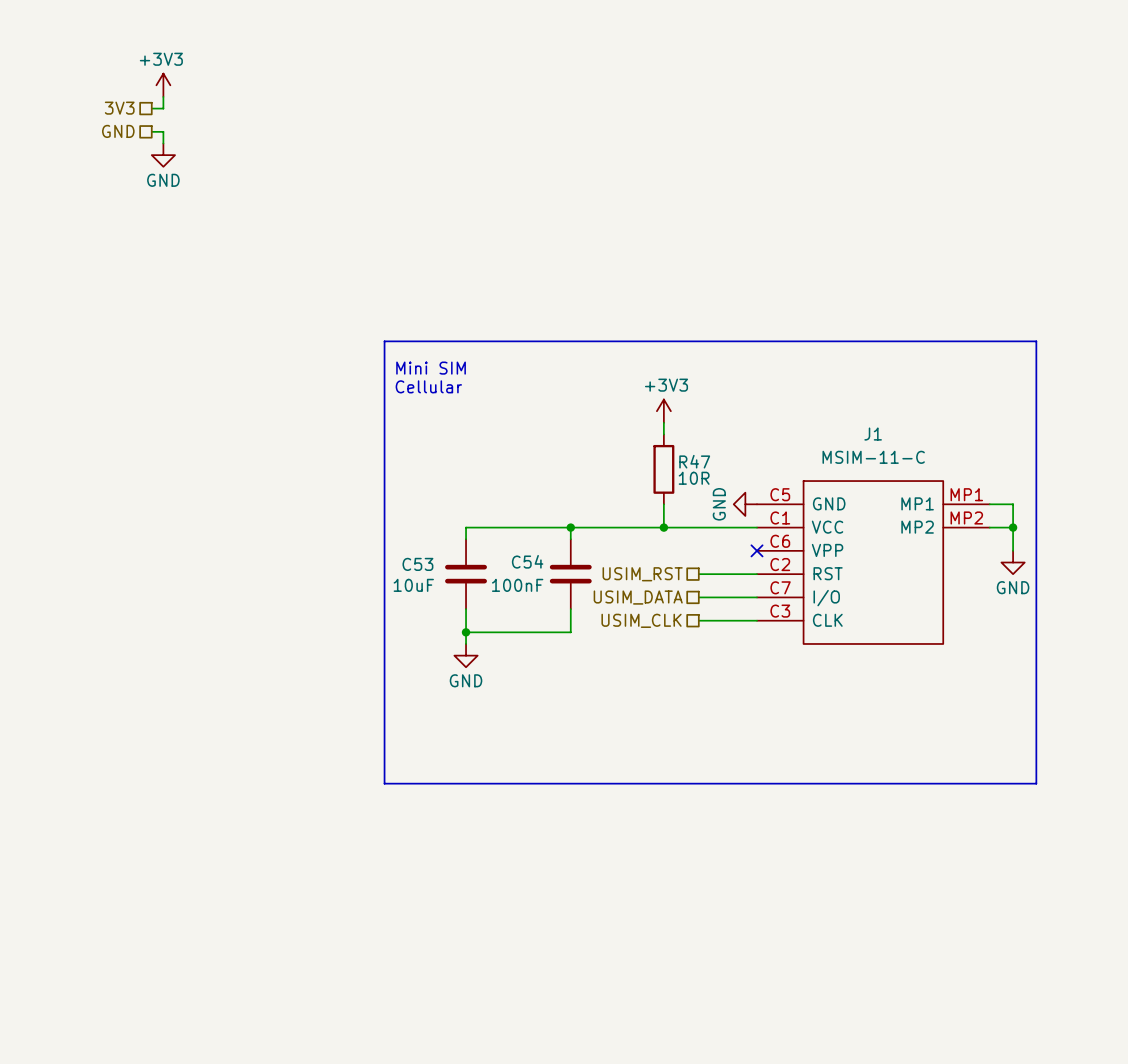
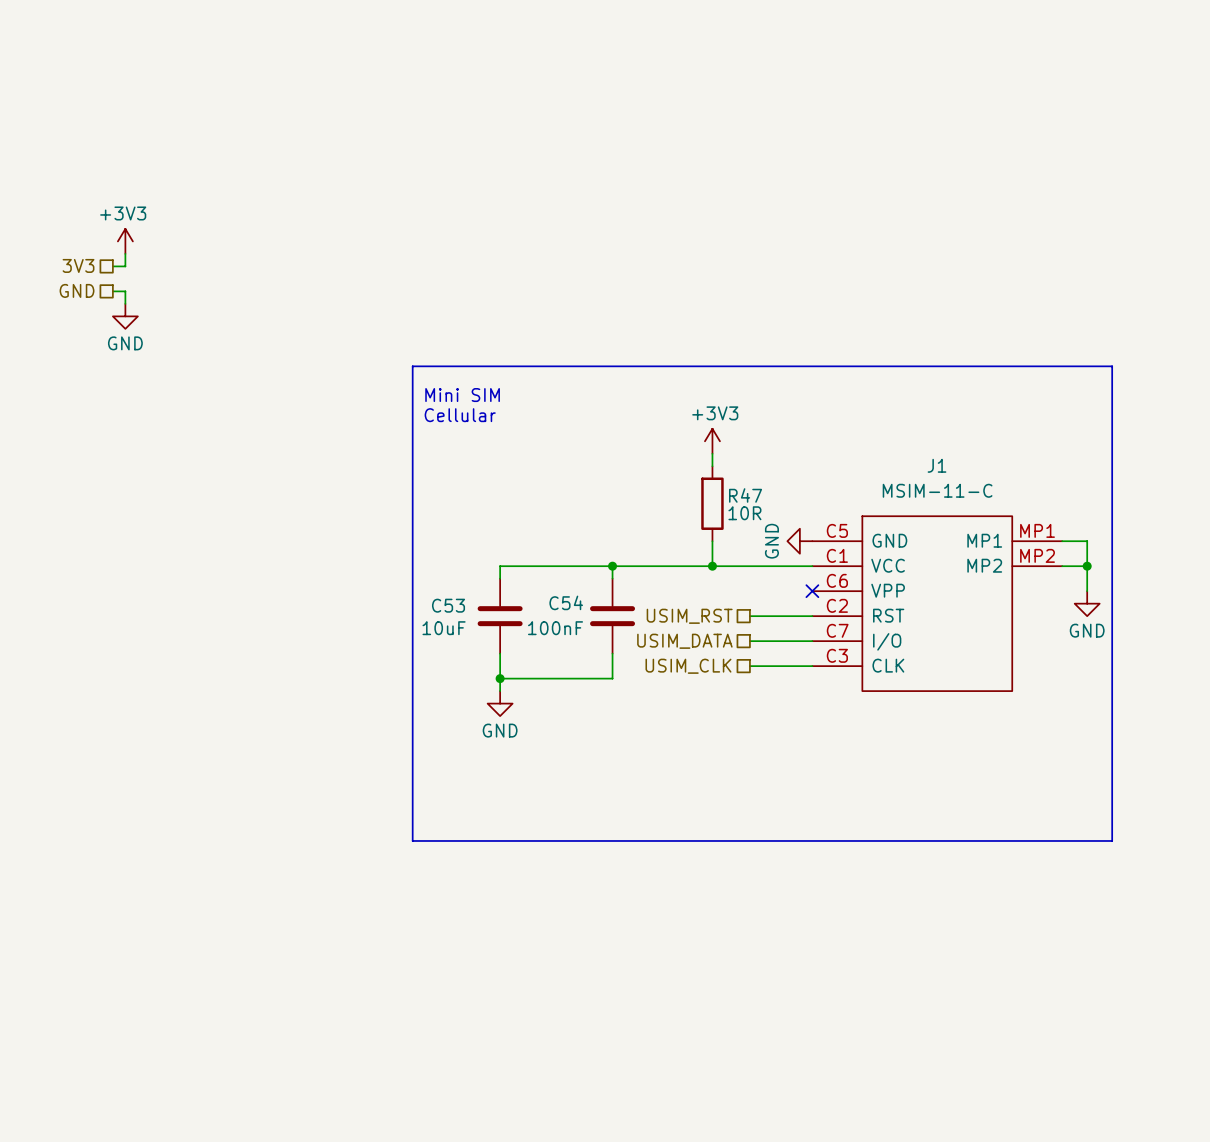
power symbol position: +3V3 (163, 85) -> +3V3 (125, 241)
wire: (163, 96) (163, 108) (151, 108) -> (125, 253) (125, 266) (112, 266)
hierarchical label position: 3V3 (119, 108) -> 3V3 (78, 265)
hierarchical label position: GND (118, 131) -> GND (77, 290)
wire: (151, 131) (163, 131) (163, 143) -> (112, 291) (125, 291) (125, 303)
power symbol position: GND (163, 155) -> GND (125, 316)

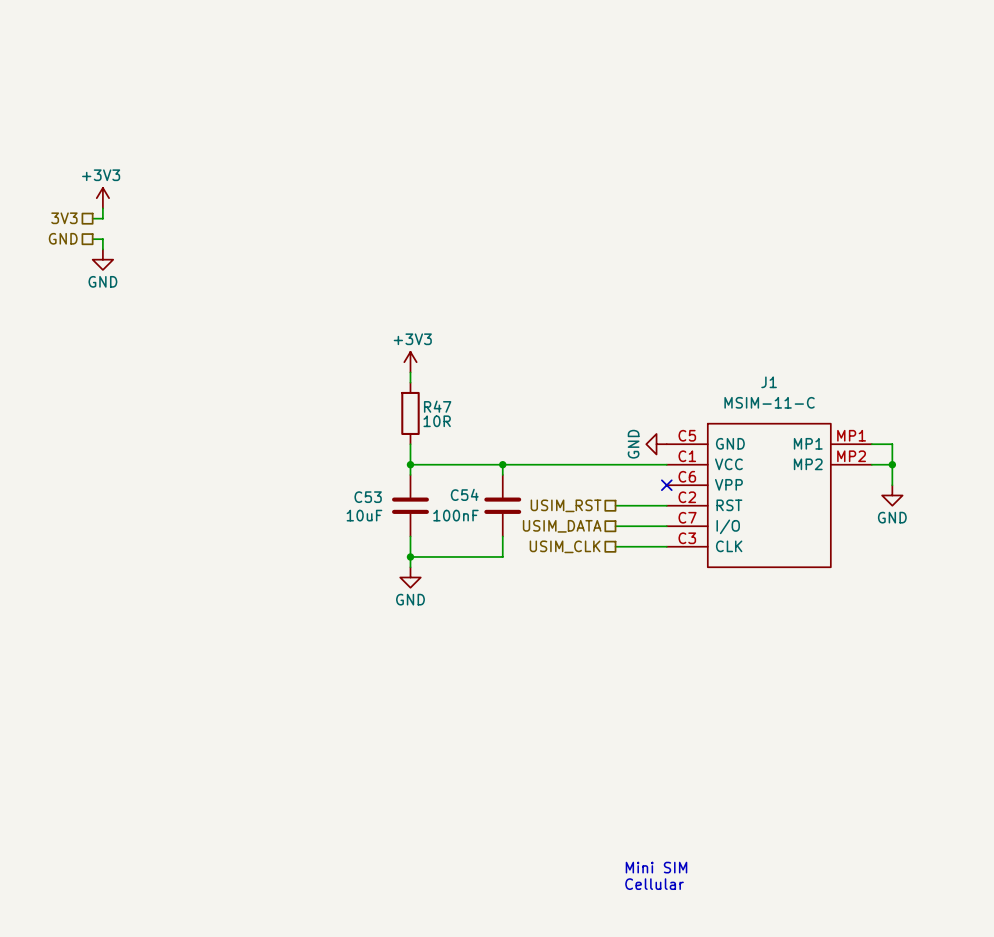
line: (412, 366) (1112, 366) (1112, 840) (412, 840) (412, 366) -> none
text: Mini SIM (462, 395) -> none
text: Cellular (460, 415) -> none
power symbol position: +3V3 (712, 441) -> +3V3 (410, 362)
wire: (712, 453) (712, 466) -> (410, 372) (410, 382)
R47 position: (712, 503) -> (410, 413)
wire: (712, 541) (712, 566) -> (410, 444) (410, 464)
junction: none -> (410, 464)
junction: (712, 566) -> none
text: none -> Mini SIM (656, 867)
text: none -> Cellular (654, 884)

